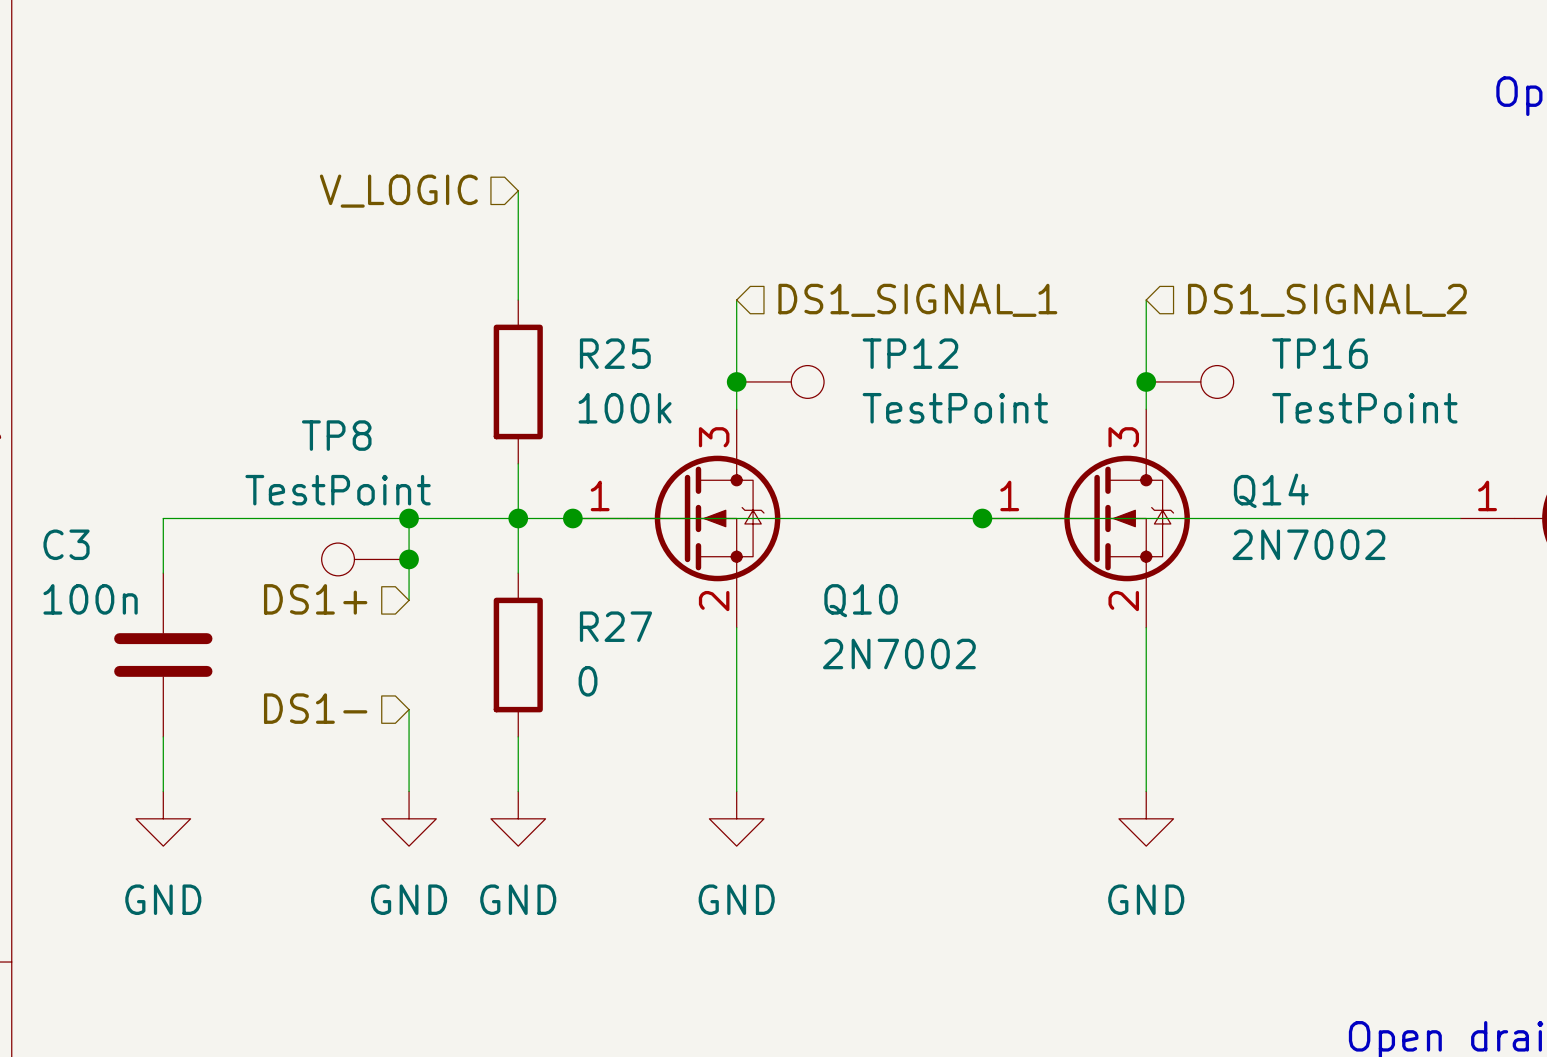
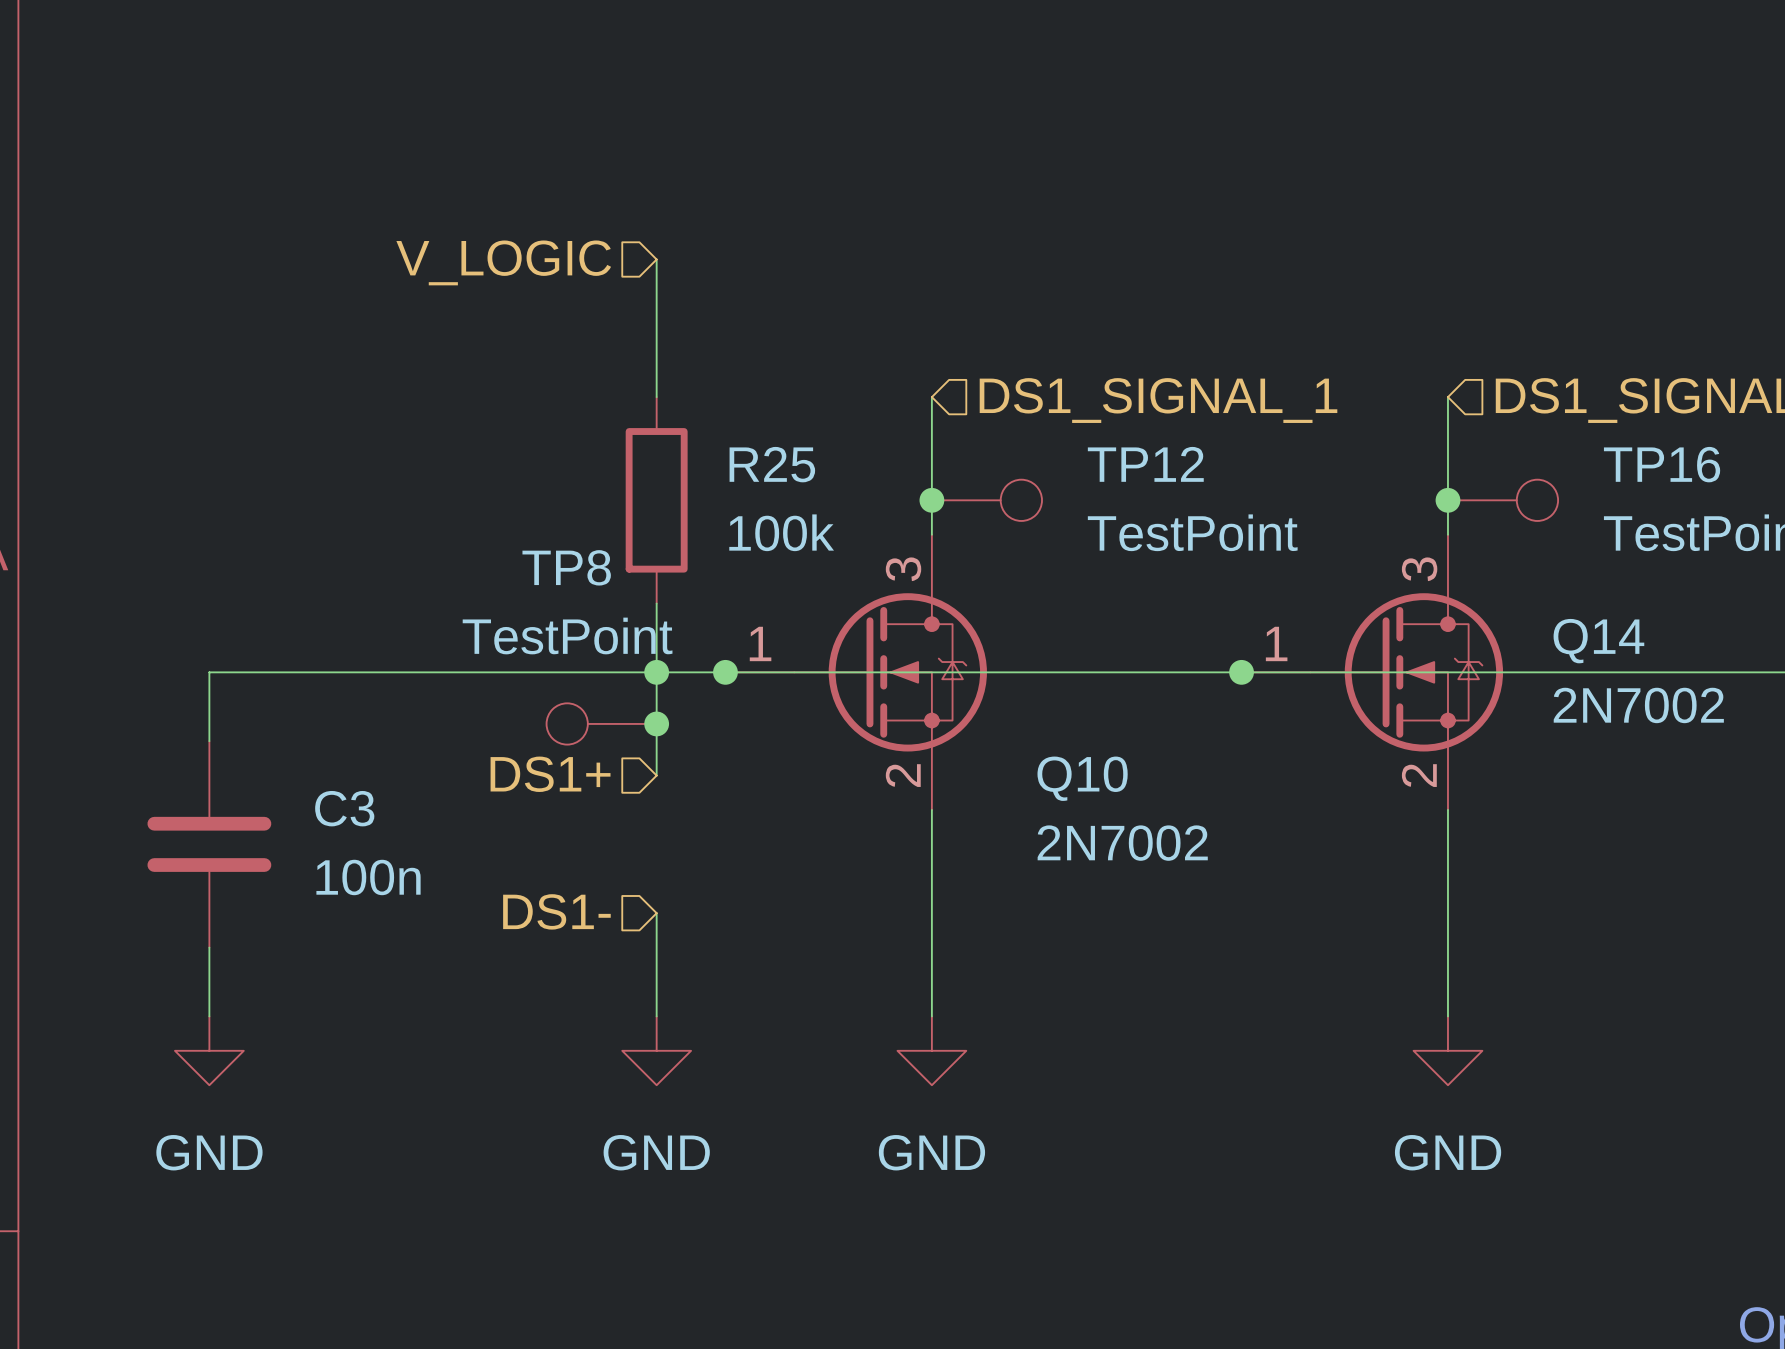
wire: (409, 518) (409, 600) -> none
junction: (409, 518) -> none
C3 name position: C3 (66, 544) -> C3 (344, 808)
TP8 position: (365, 559) -> (601, 723)
junction: (409, 559) -> none
junction: none -> (656, 723)
C3 value position: 100n (90, 599) -> 100n (368, 877)
hierarchical label position: DS1+ (315, 599) -> DS1+ (550, 774)
R27: 0 (518, 655) -> none
hierarchical label position: DS1- (315, 708) -> DS1- (556, 911)
wire: (409, 709) (409, 791) -> none
power symbol: GND (409, 818) -> none

